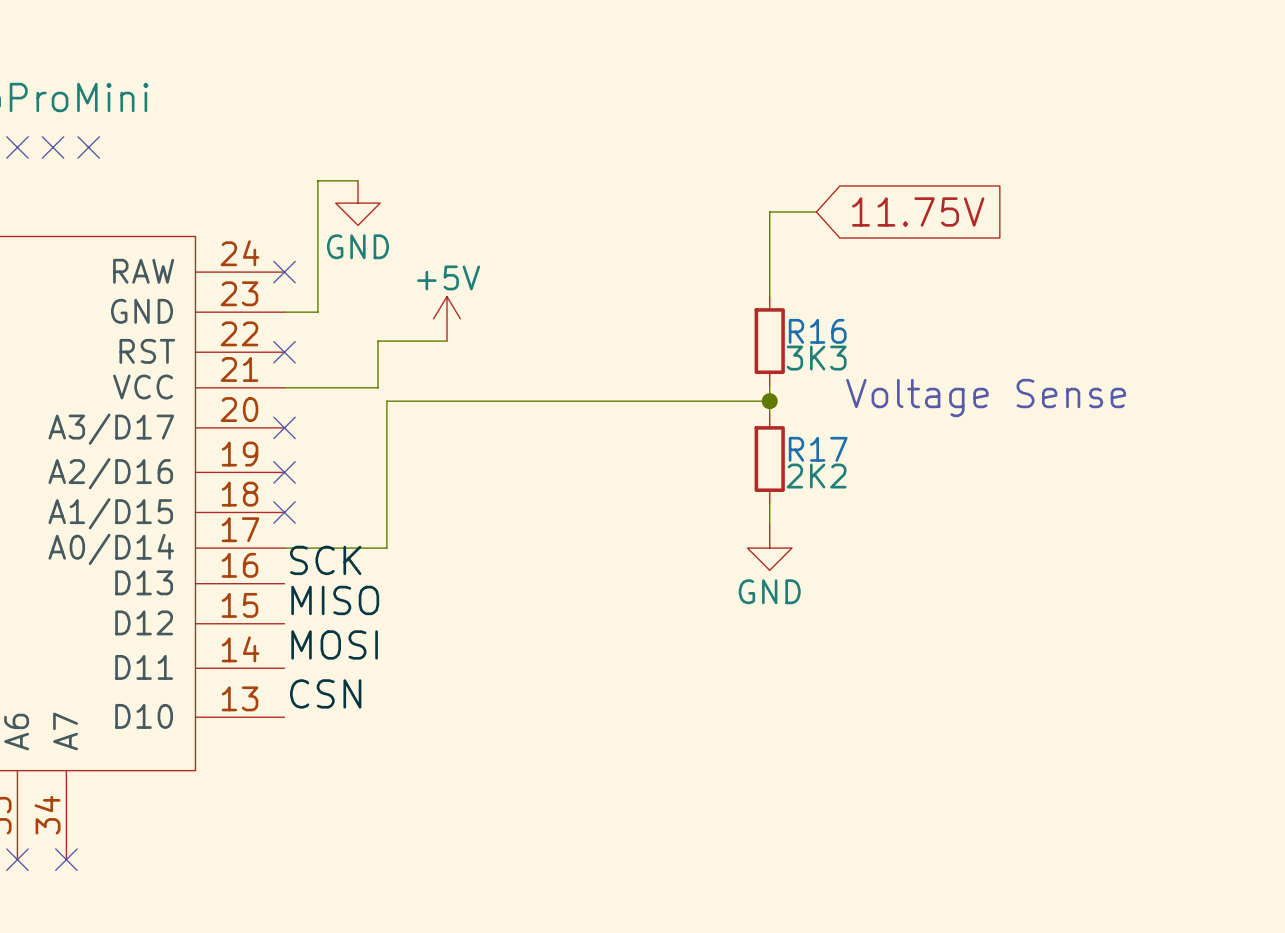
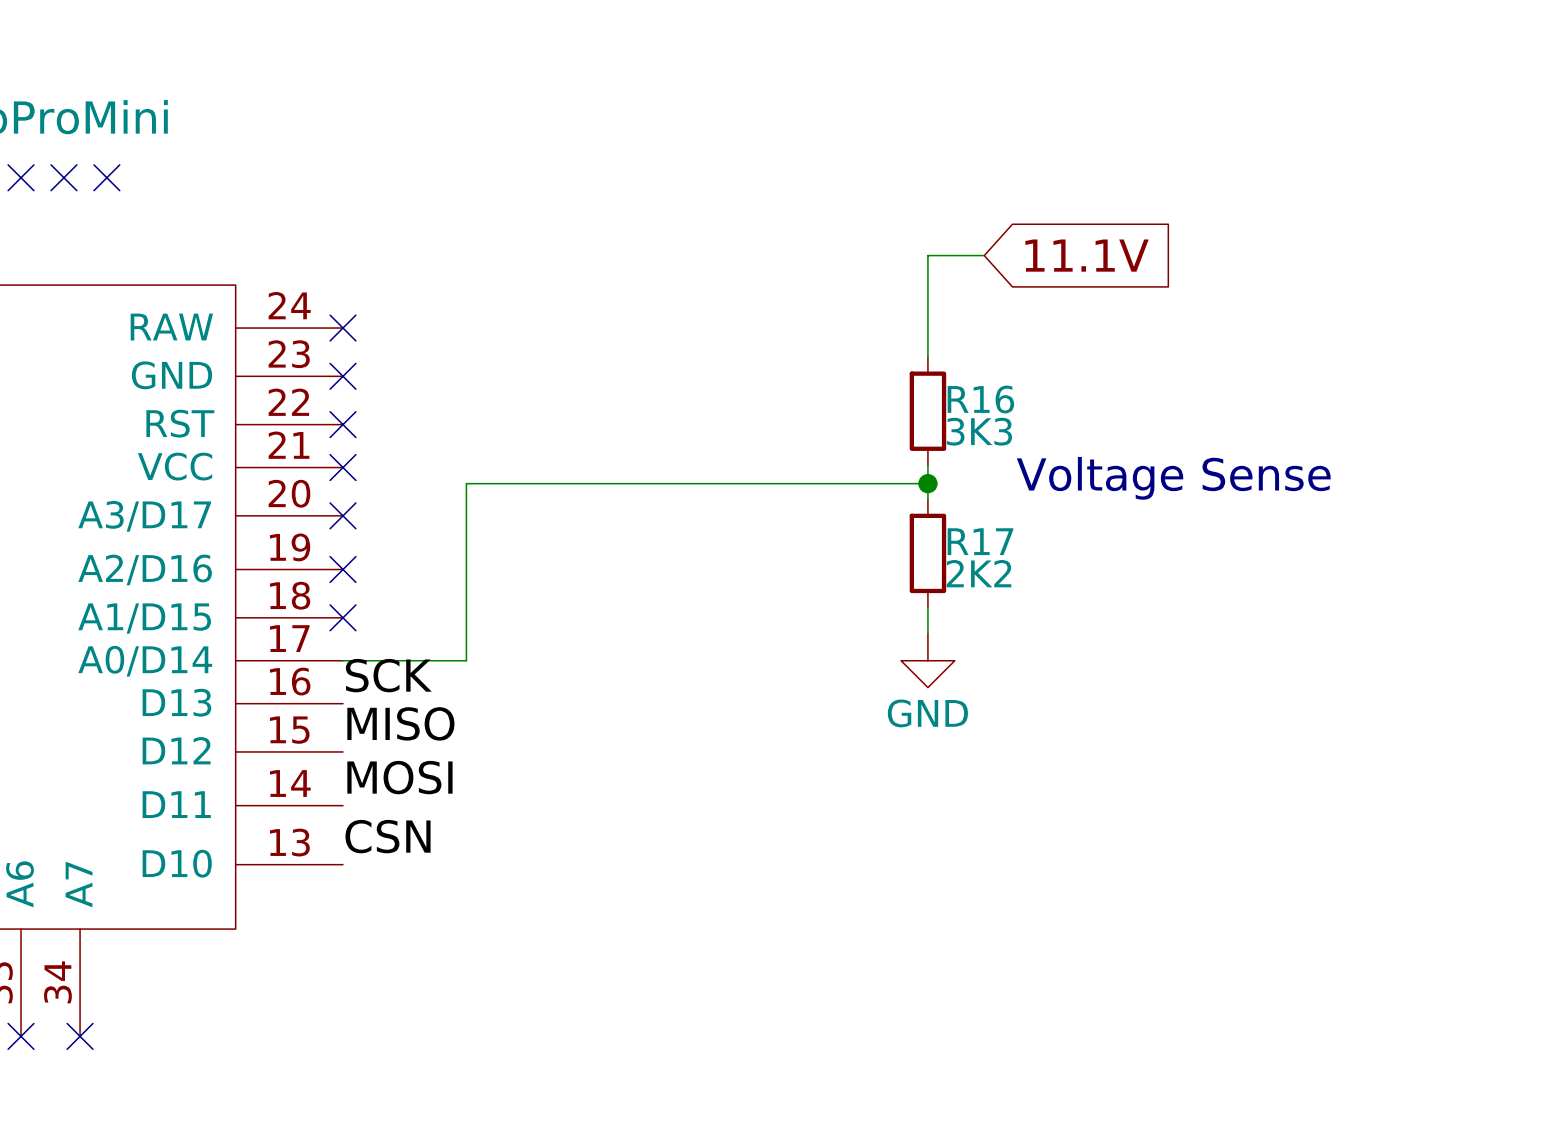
wire: (357, 180) (317, 180) (317, 312) (284, 312) -> none
power symbol: GND (357, 203) -> none
global label: 11.75V (918, 212) -> 11.1V (1087, 255)
no-connect mark: none -> (343, 376)
power symbol: +5V (446, 318) -> none
wire: (446, 341) (377, 341) (377, 387) (284, 387) -> none
no-connect mark: none -> (343, 467)

